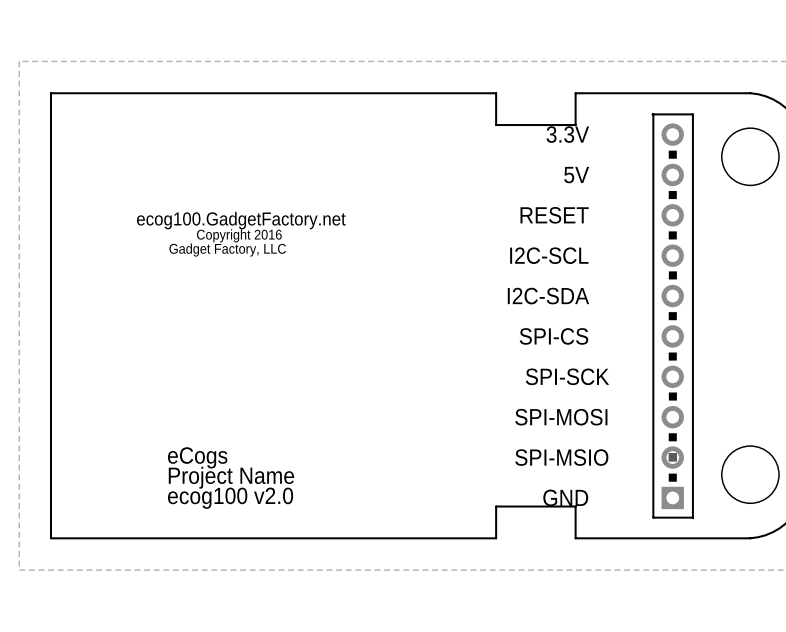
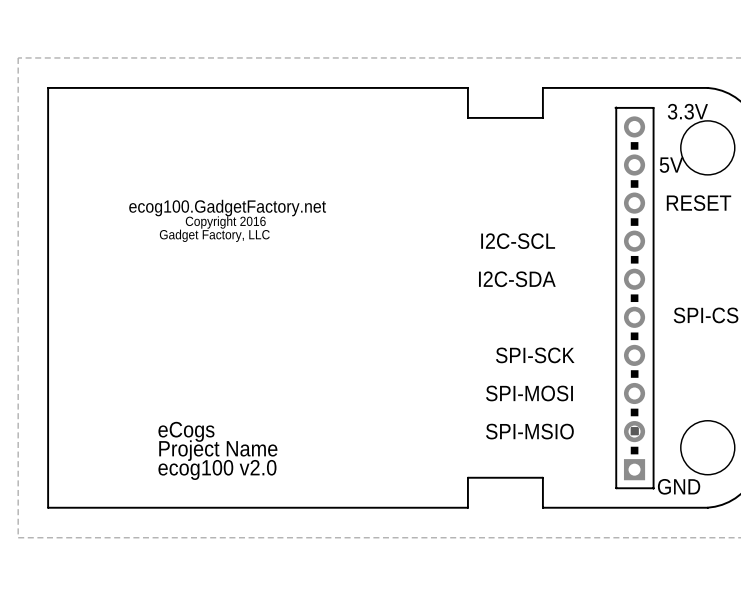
text position: 3.3V (567, 134) -> 3.3V (687, 111)
text position: 5V (576, 175) -> 5V (671, 165)
text position: RESET (554, 215) -> RESET (699, 203)
text position: SPI-CS (553, 336) -> SPI-CS (706, 315)
text position: GND (565, 497) -> GND (679, 486)

